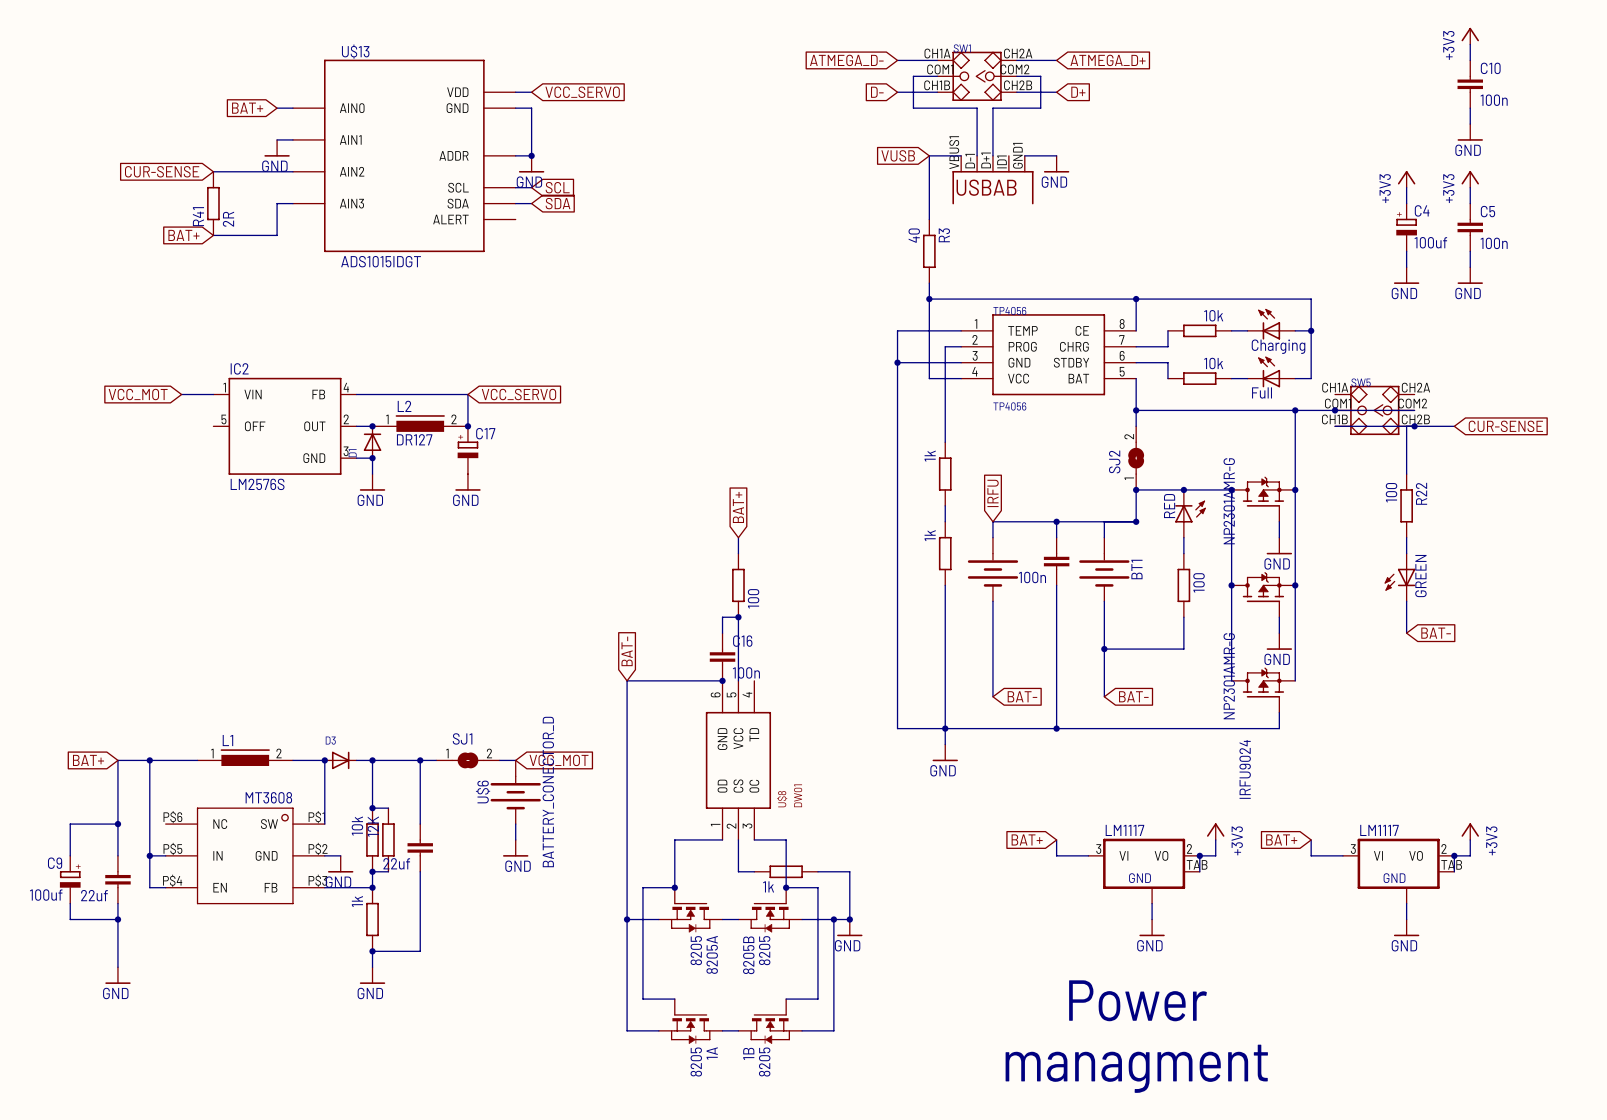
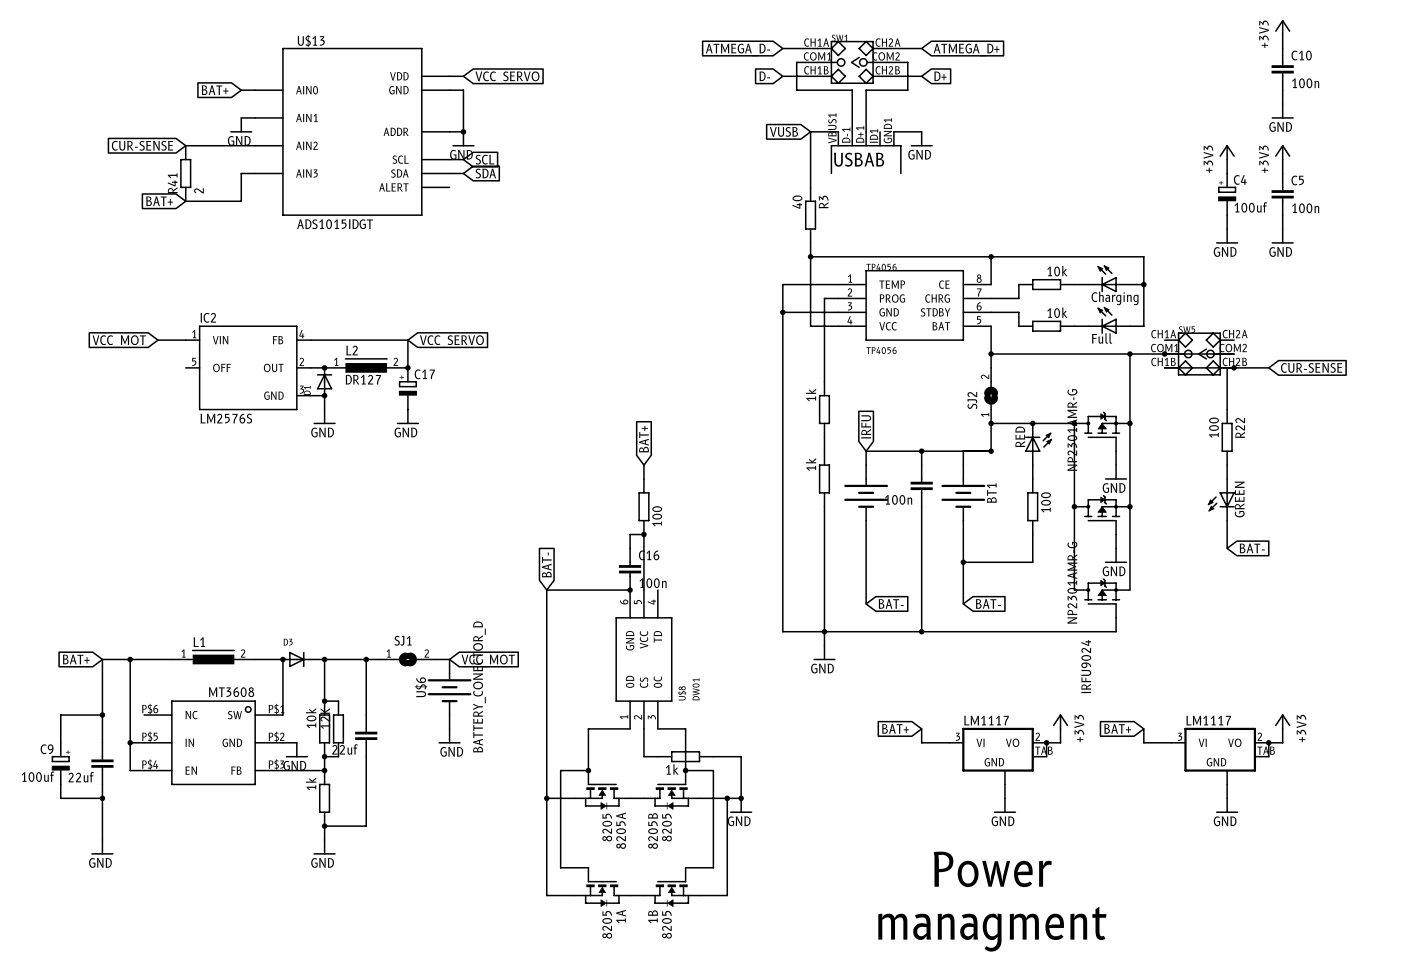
R41 value: 2R (228, 219) -> 2 (198, 190)

